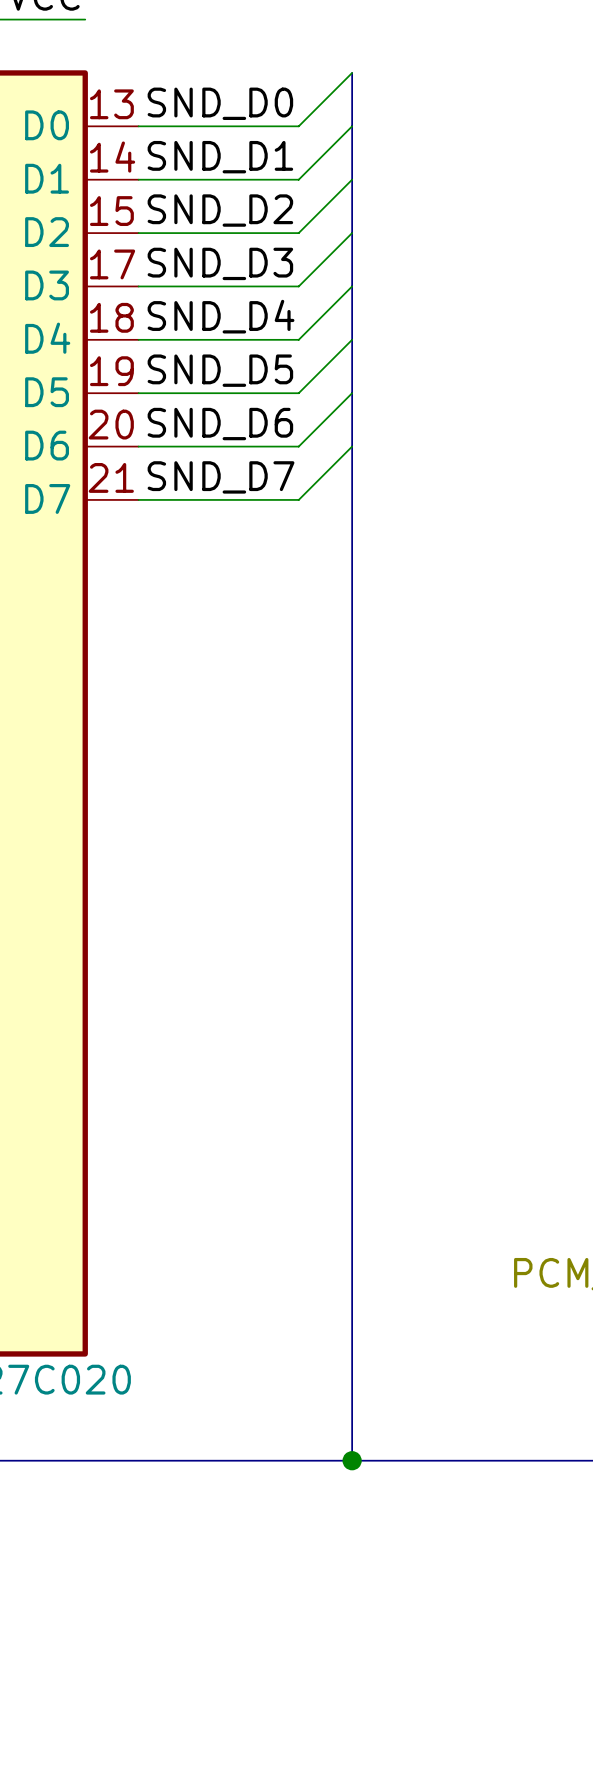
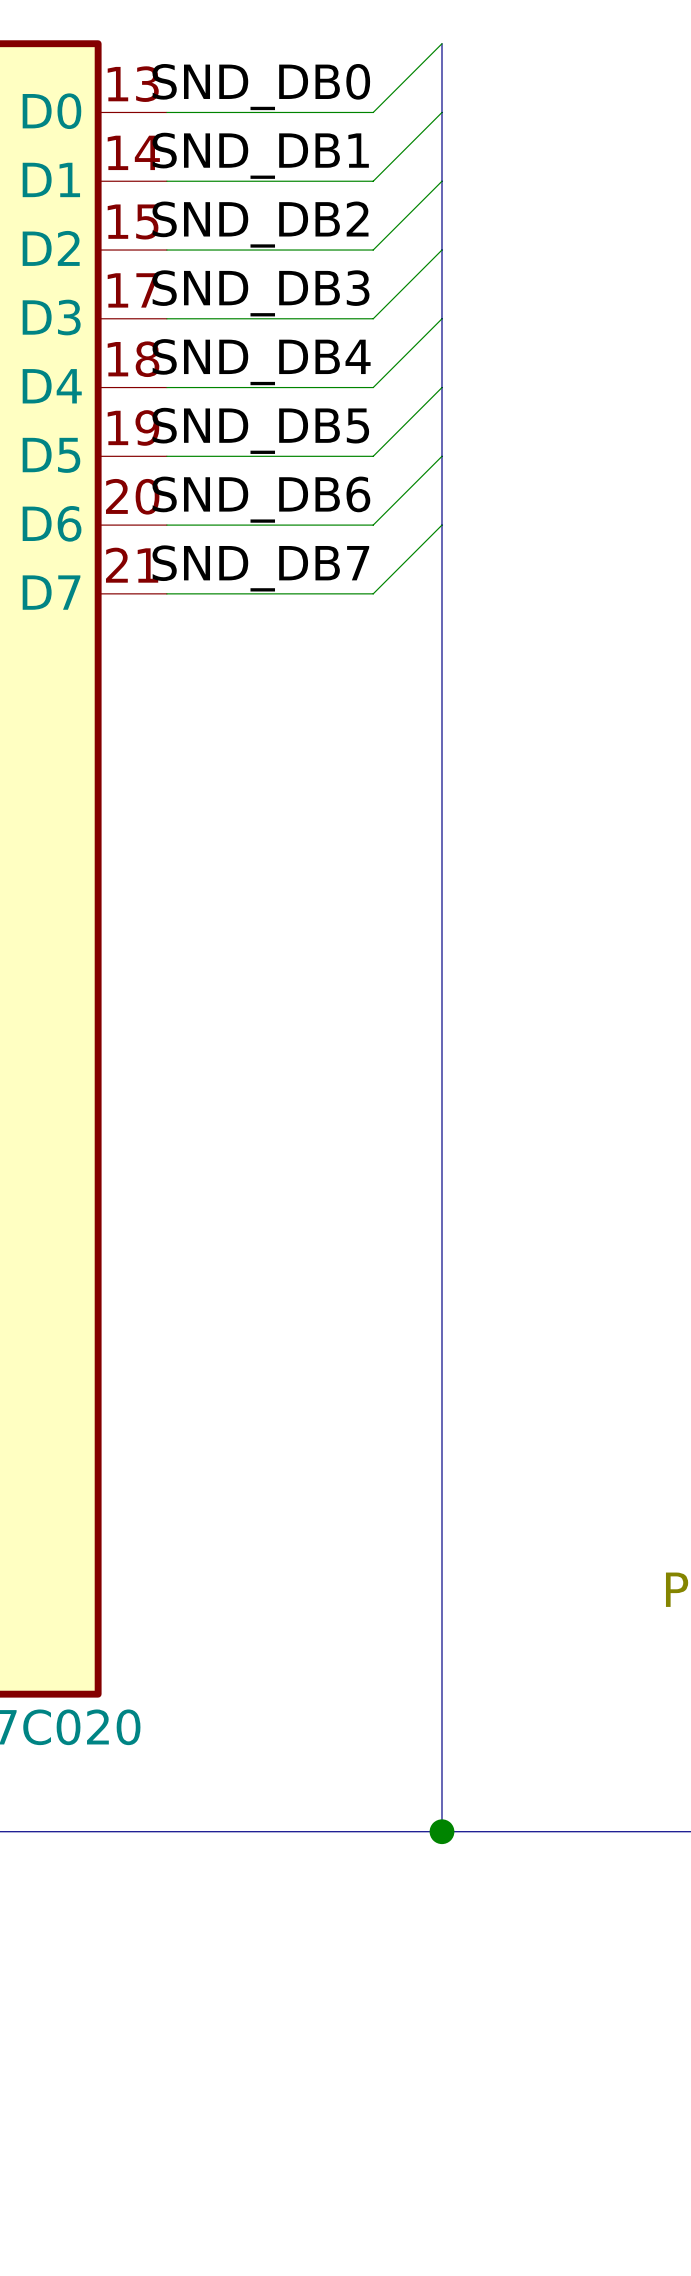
label: SND_D0 (220, 103) -> SND_DB0 (261, 87)
label: SND_D1 (220, 157) -> SND_DB1 (260, 155)
label: SND_D2 (220, 210) -> SND_DB2 (260, 224)
label: SND_D3 (220, 263) -> SND_DB3 (260, 293)
label: SND_D4 (221, 316) -> SND_DB4 (261, 362)
label: SND_D5 (220, 370) -> SND_DB5 (260, 430)
label: SND_D6 (220, 424) -> SND_DB6 (261, 499)
label: SND_D7 (221, 477) -> SND_DB7 (260, 568)

